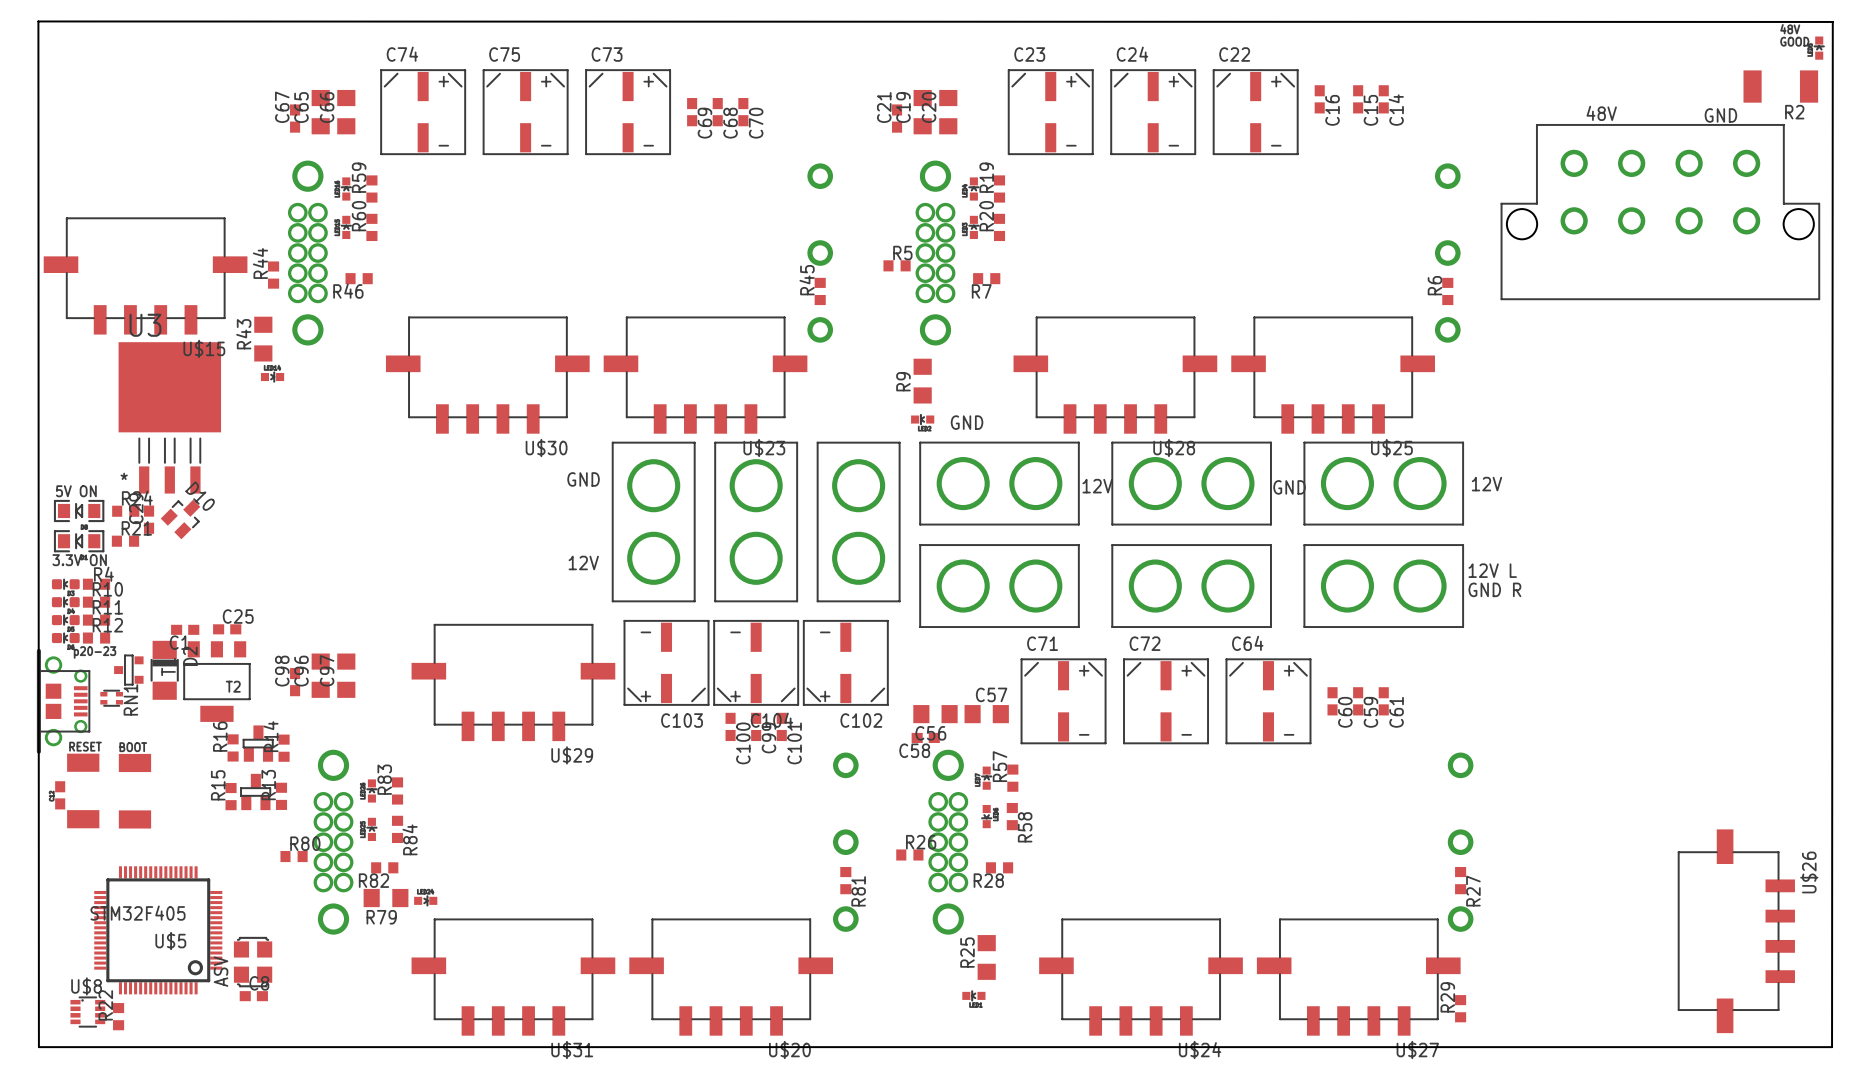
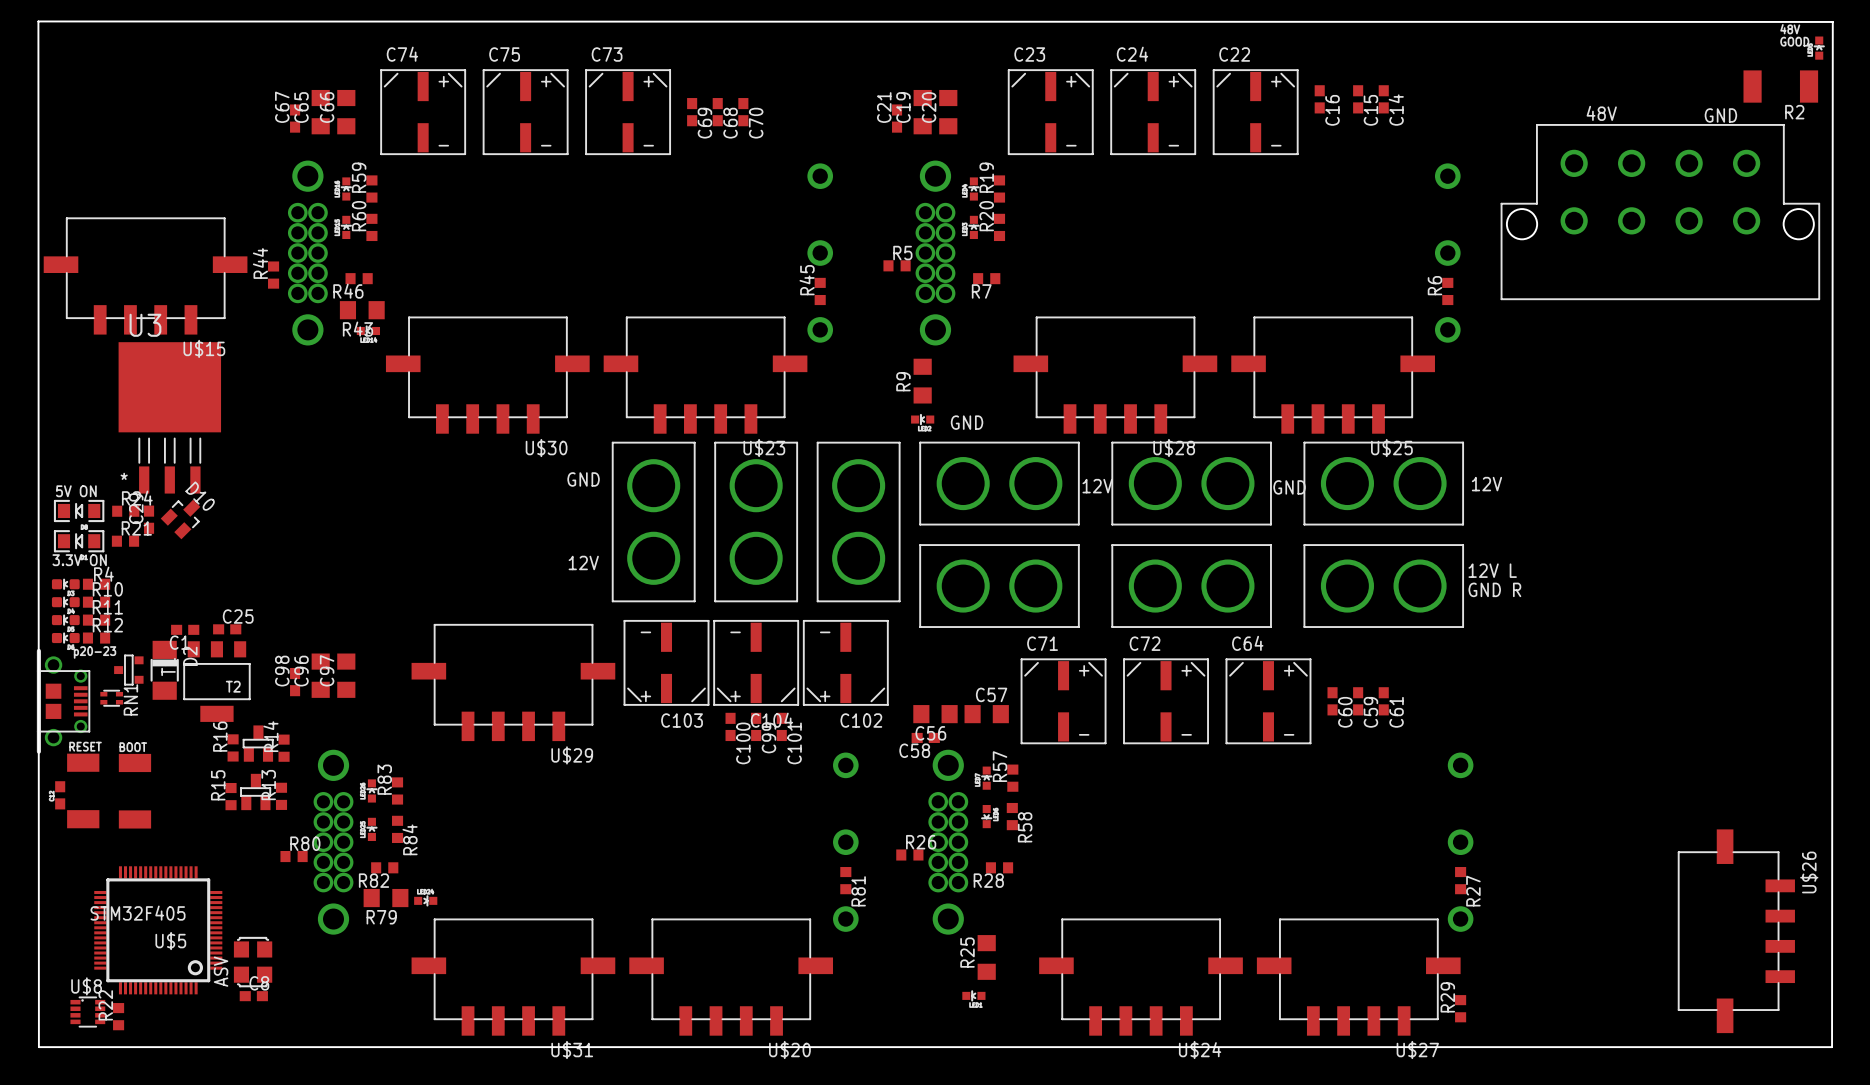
R43 name position: R43 (243, 334) -> R43 (357, 329)
R43 rotation: 0° (263, 339) -> 90° clockwise (362, 310)
R43 position: (263, 339) -> (362, 310)
part rotation: 0° (272, 377) -> 180° (368, 331)
part position: (272, 377) -> (368, 331)

